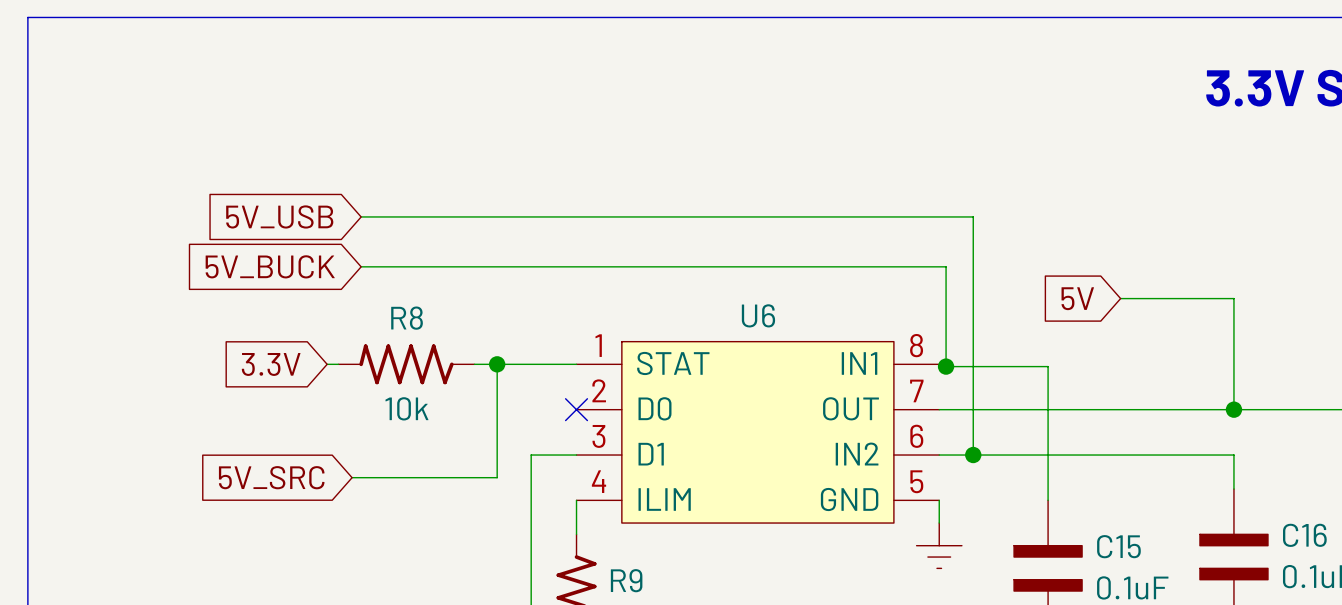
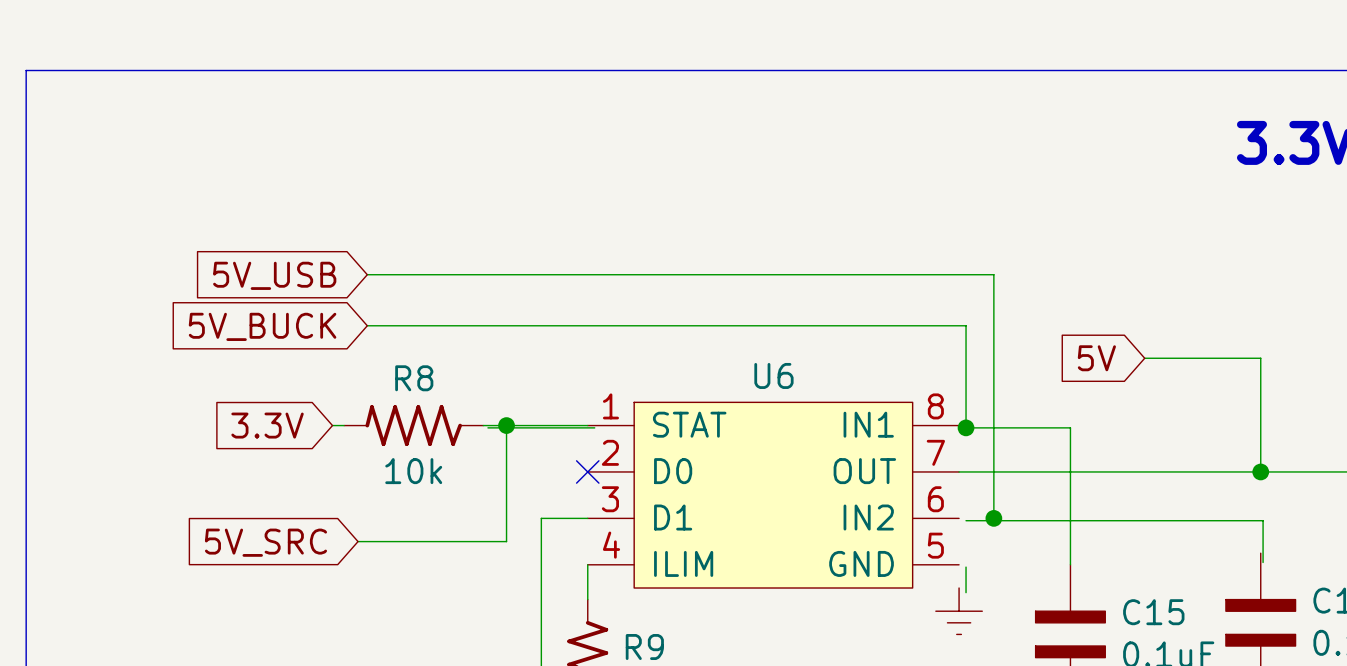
wire: none -> (487, 427) (594, 427)
wire: (939, 455) (1233, 455) (1233, 489) -> none
wire: none -> (966, 520) (1263, 520) (1263, 562)
wire: (939, 500) (939, 523) -> none
wire: none -> (966, 567) (966, 592)

